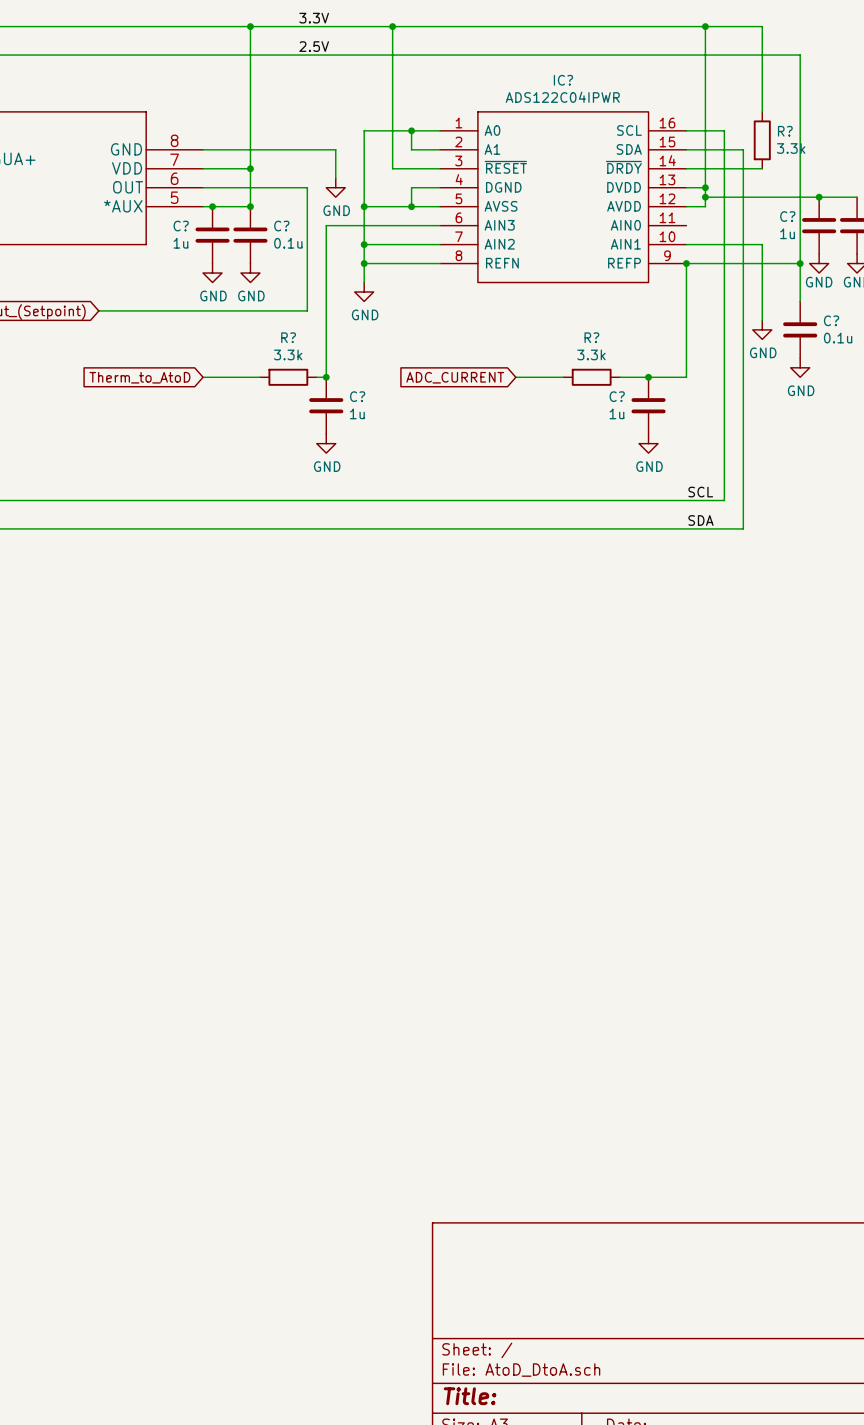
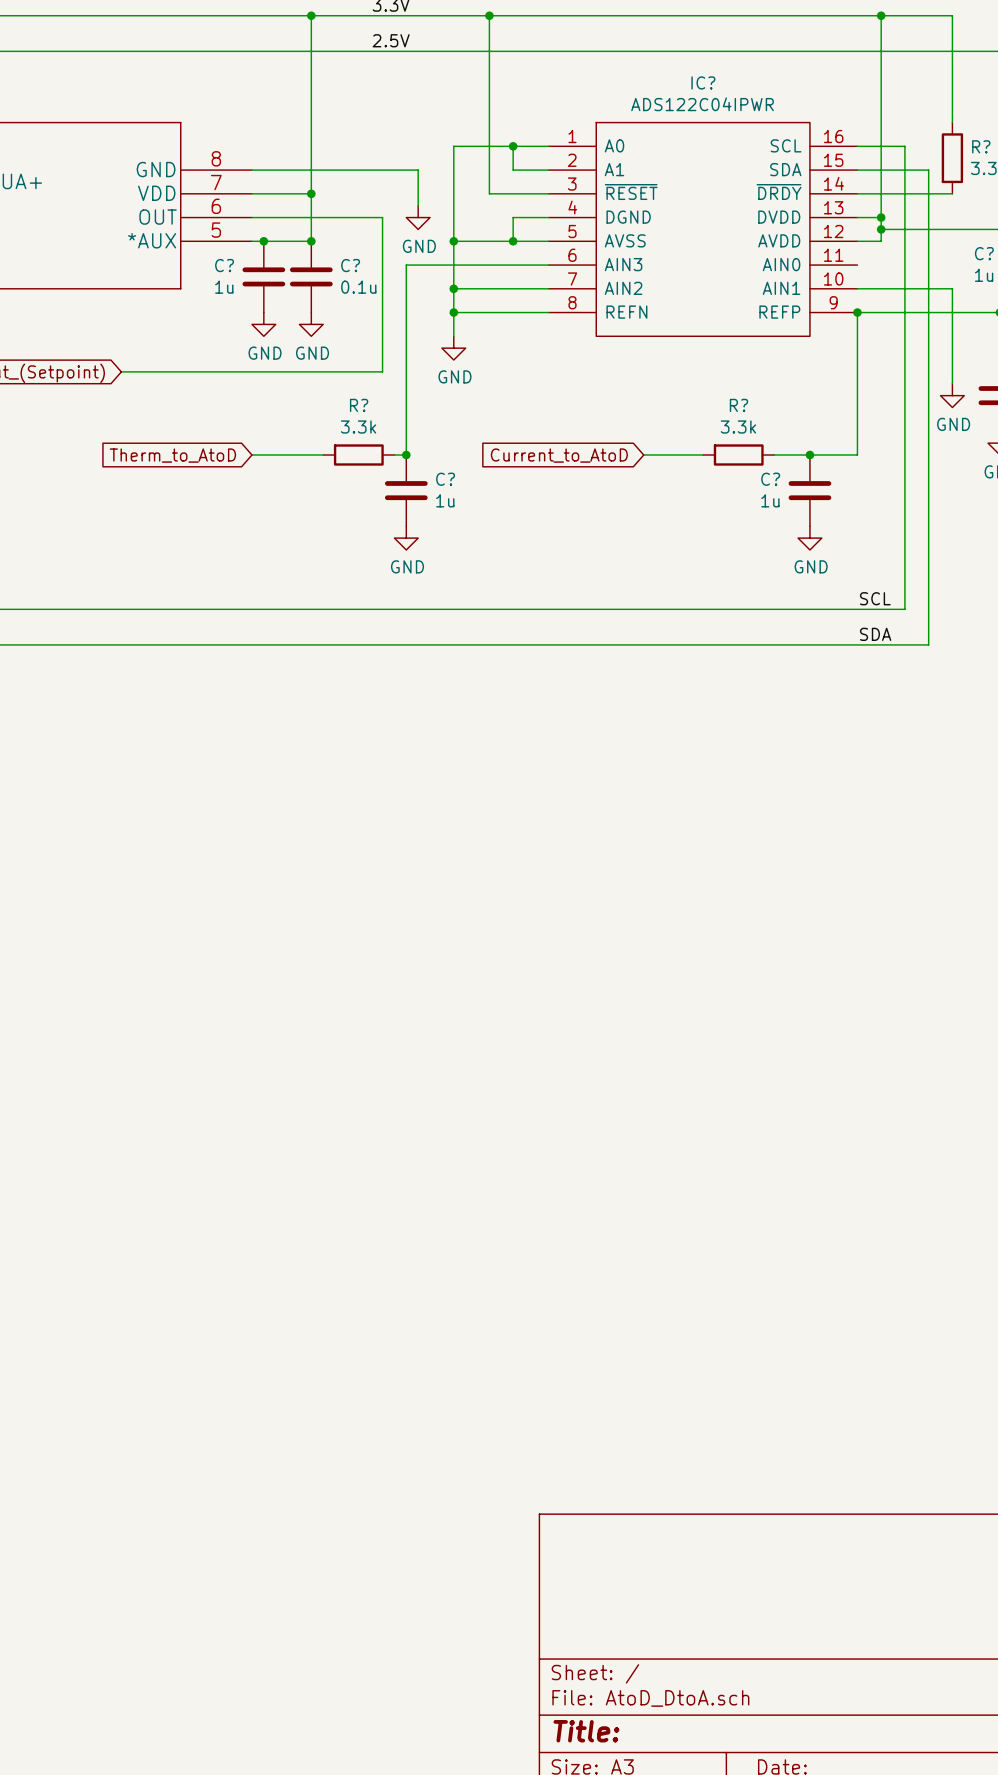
global label: ADC_CURRENT (455, 377) -> Current_to_AtoD (559, 455)

